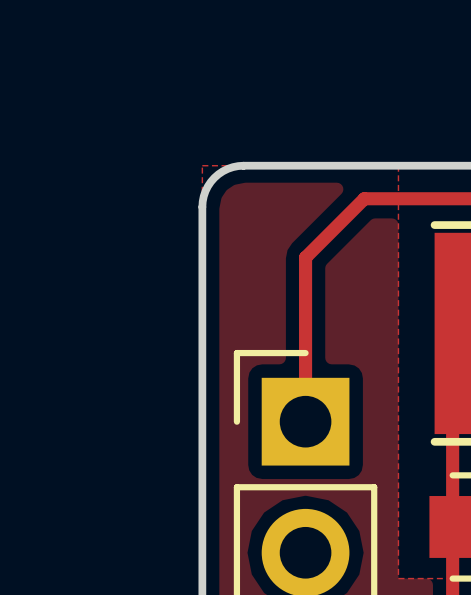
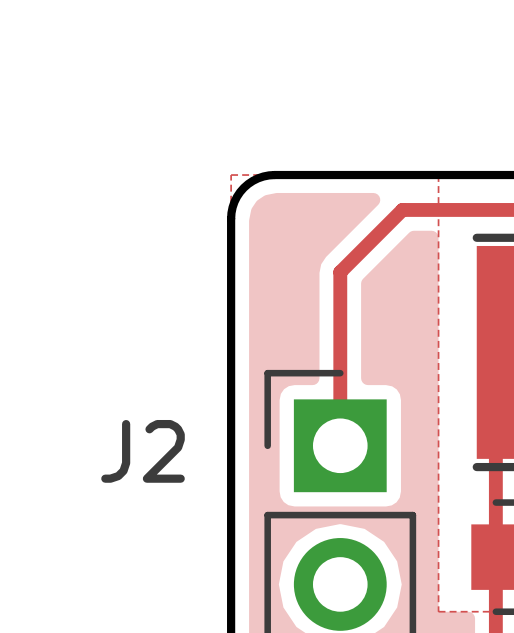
J2 name: none -> J2 (143, 451)

